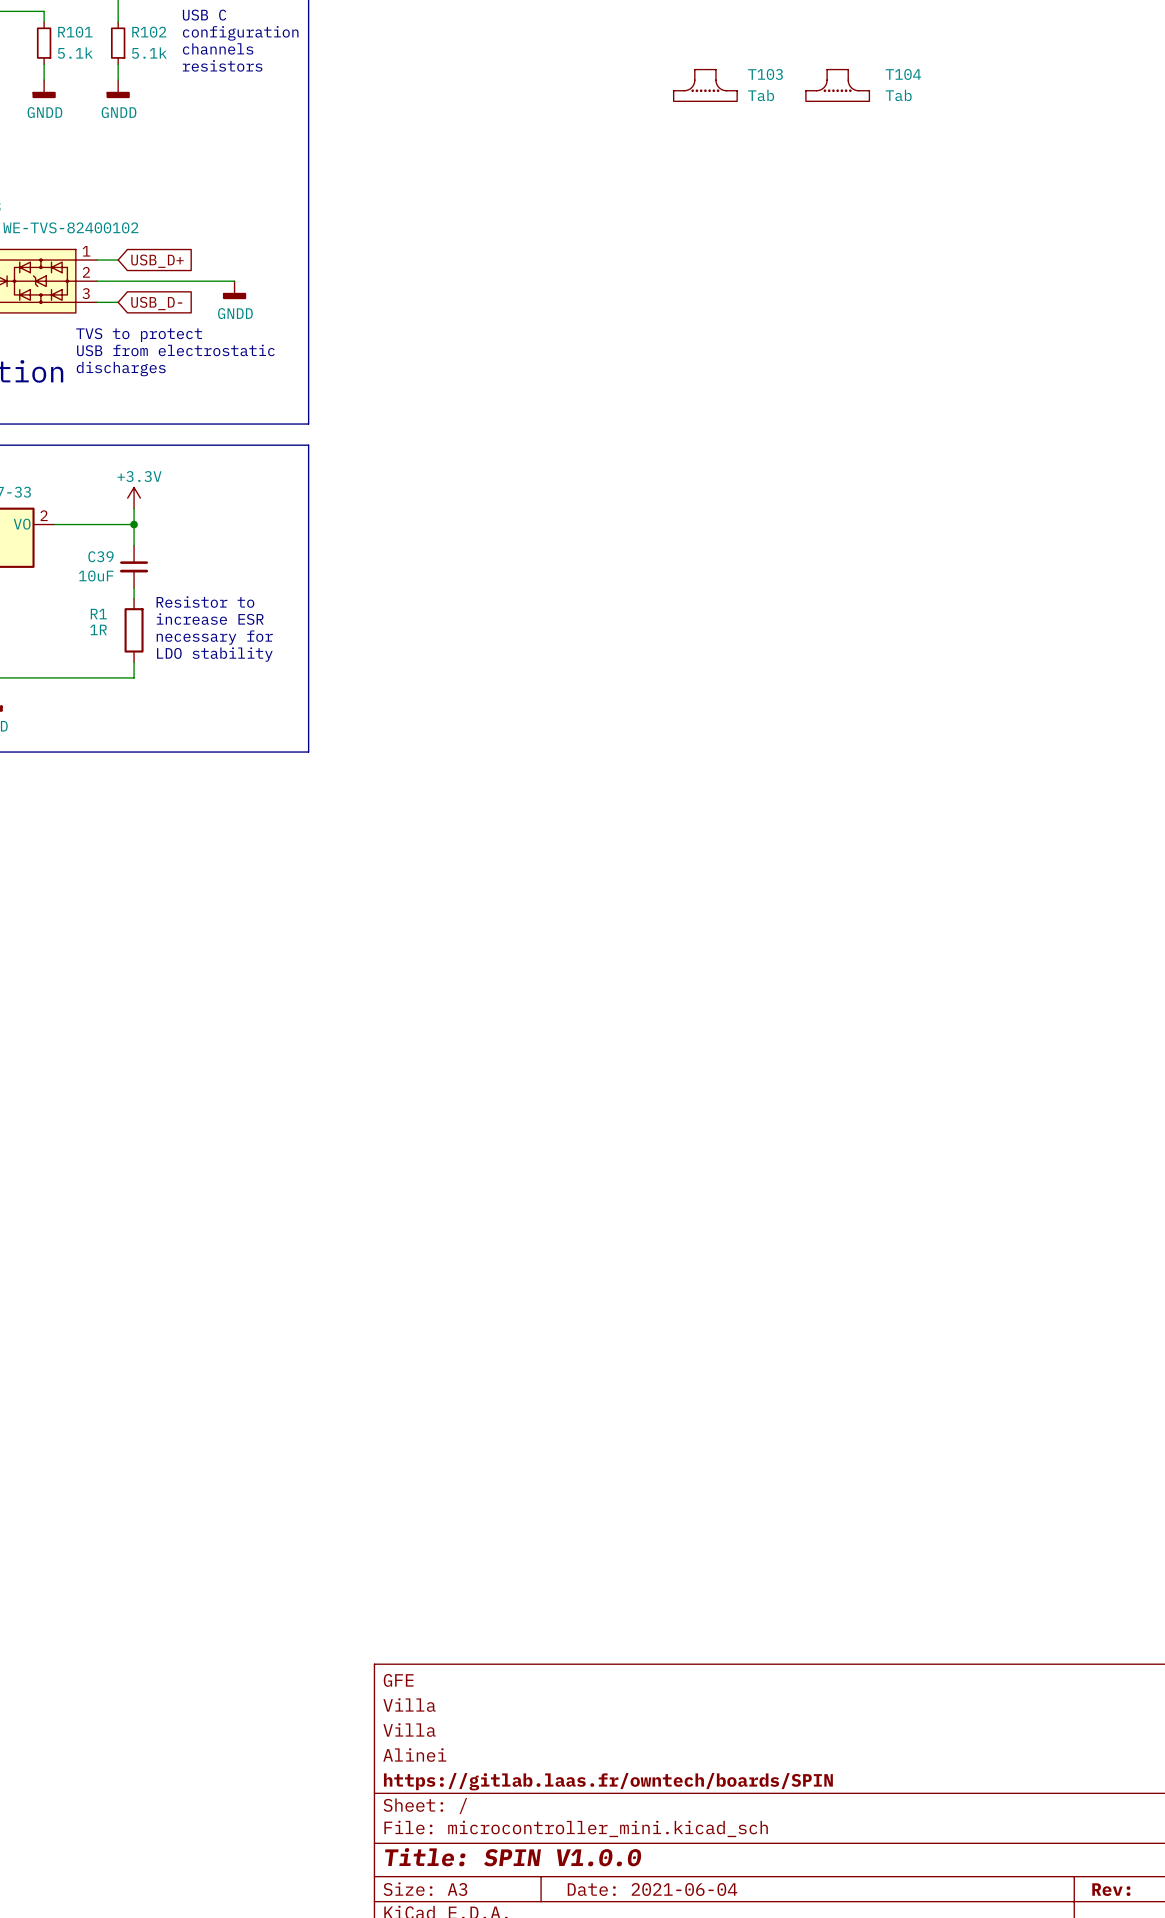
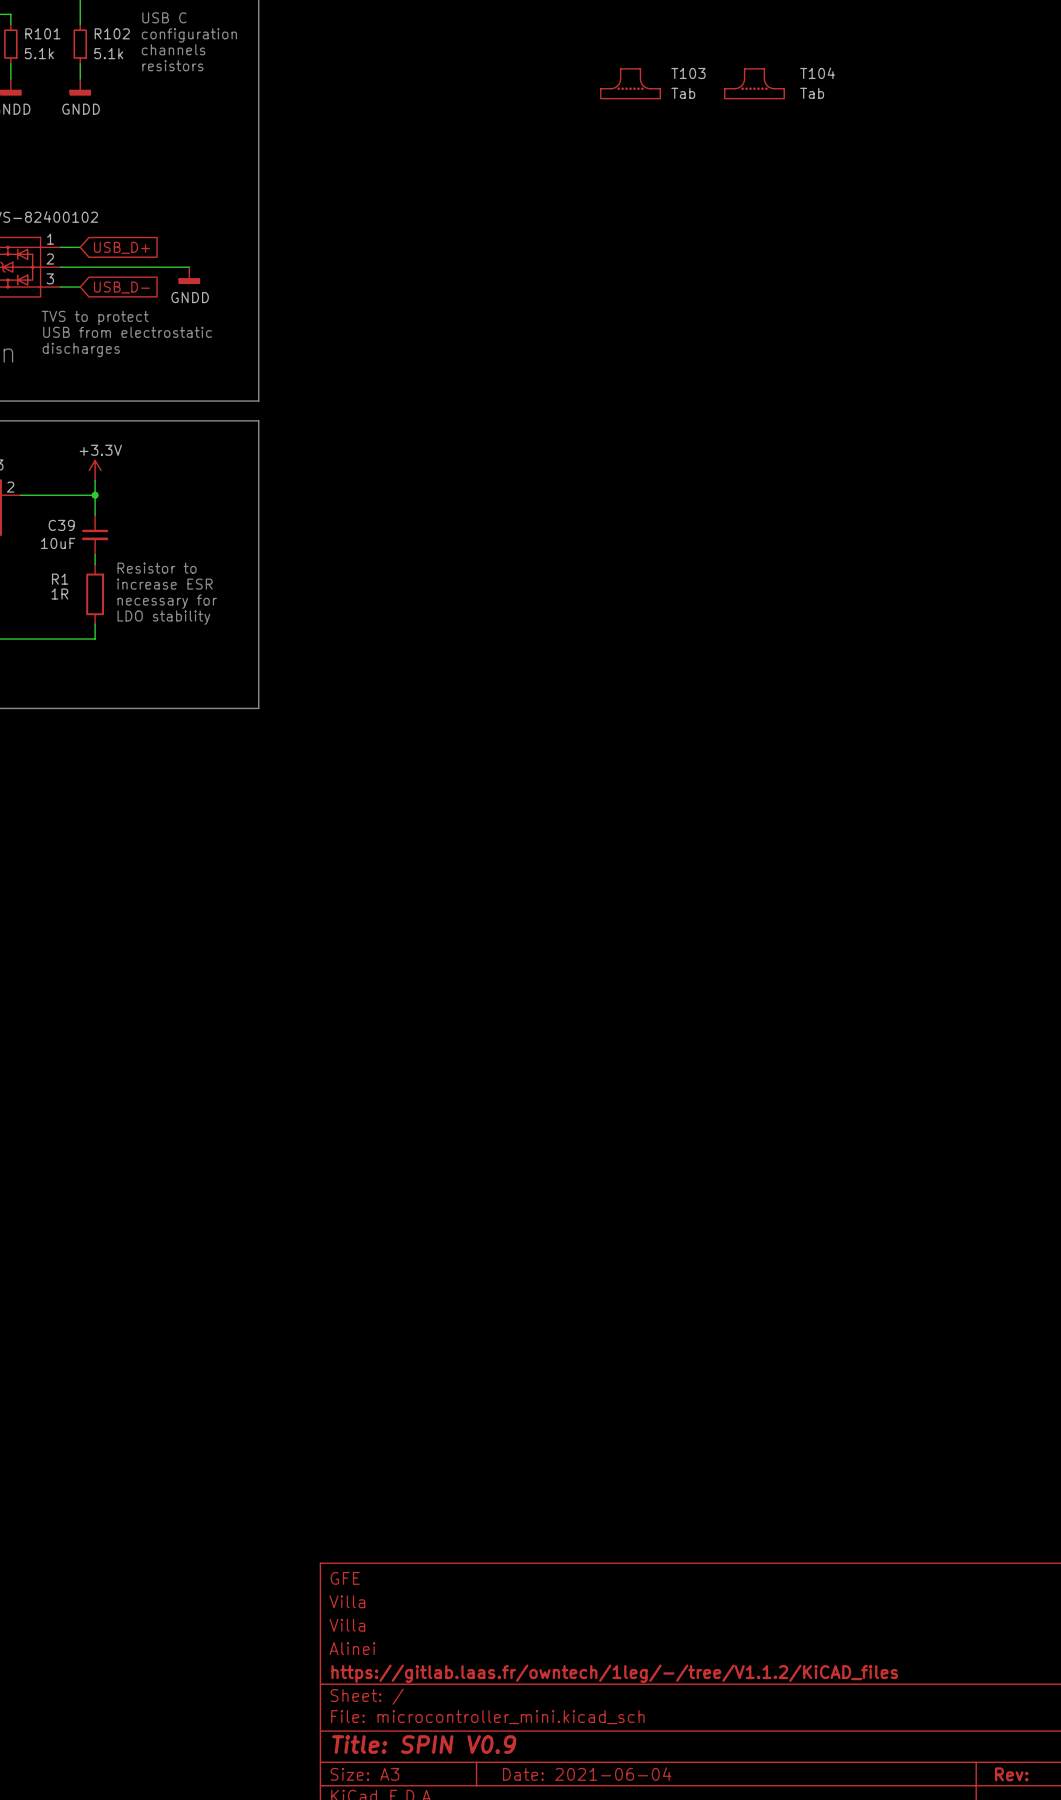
title block: https://gitlab.laas.fr/owntech/boards/SPIN (608, 1781) -> https://gitlab.laas.fr/owntech/1leg/-/tree/V1.1.2/KiCAD_files (614, 1673)
title block: Title: SPIN V1.0.0 (513, 1857) -> Title: SPIN V0.9 (424, 1744)

